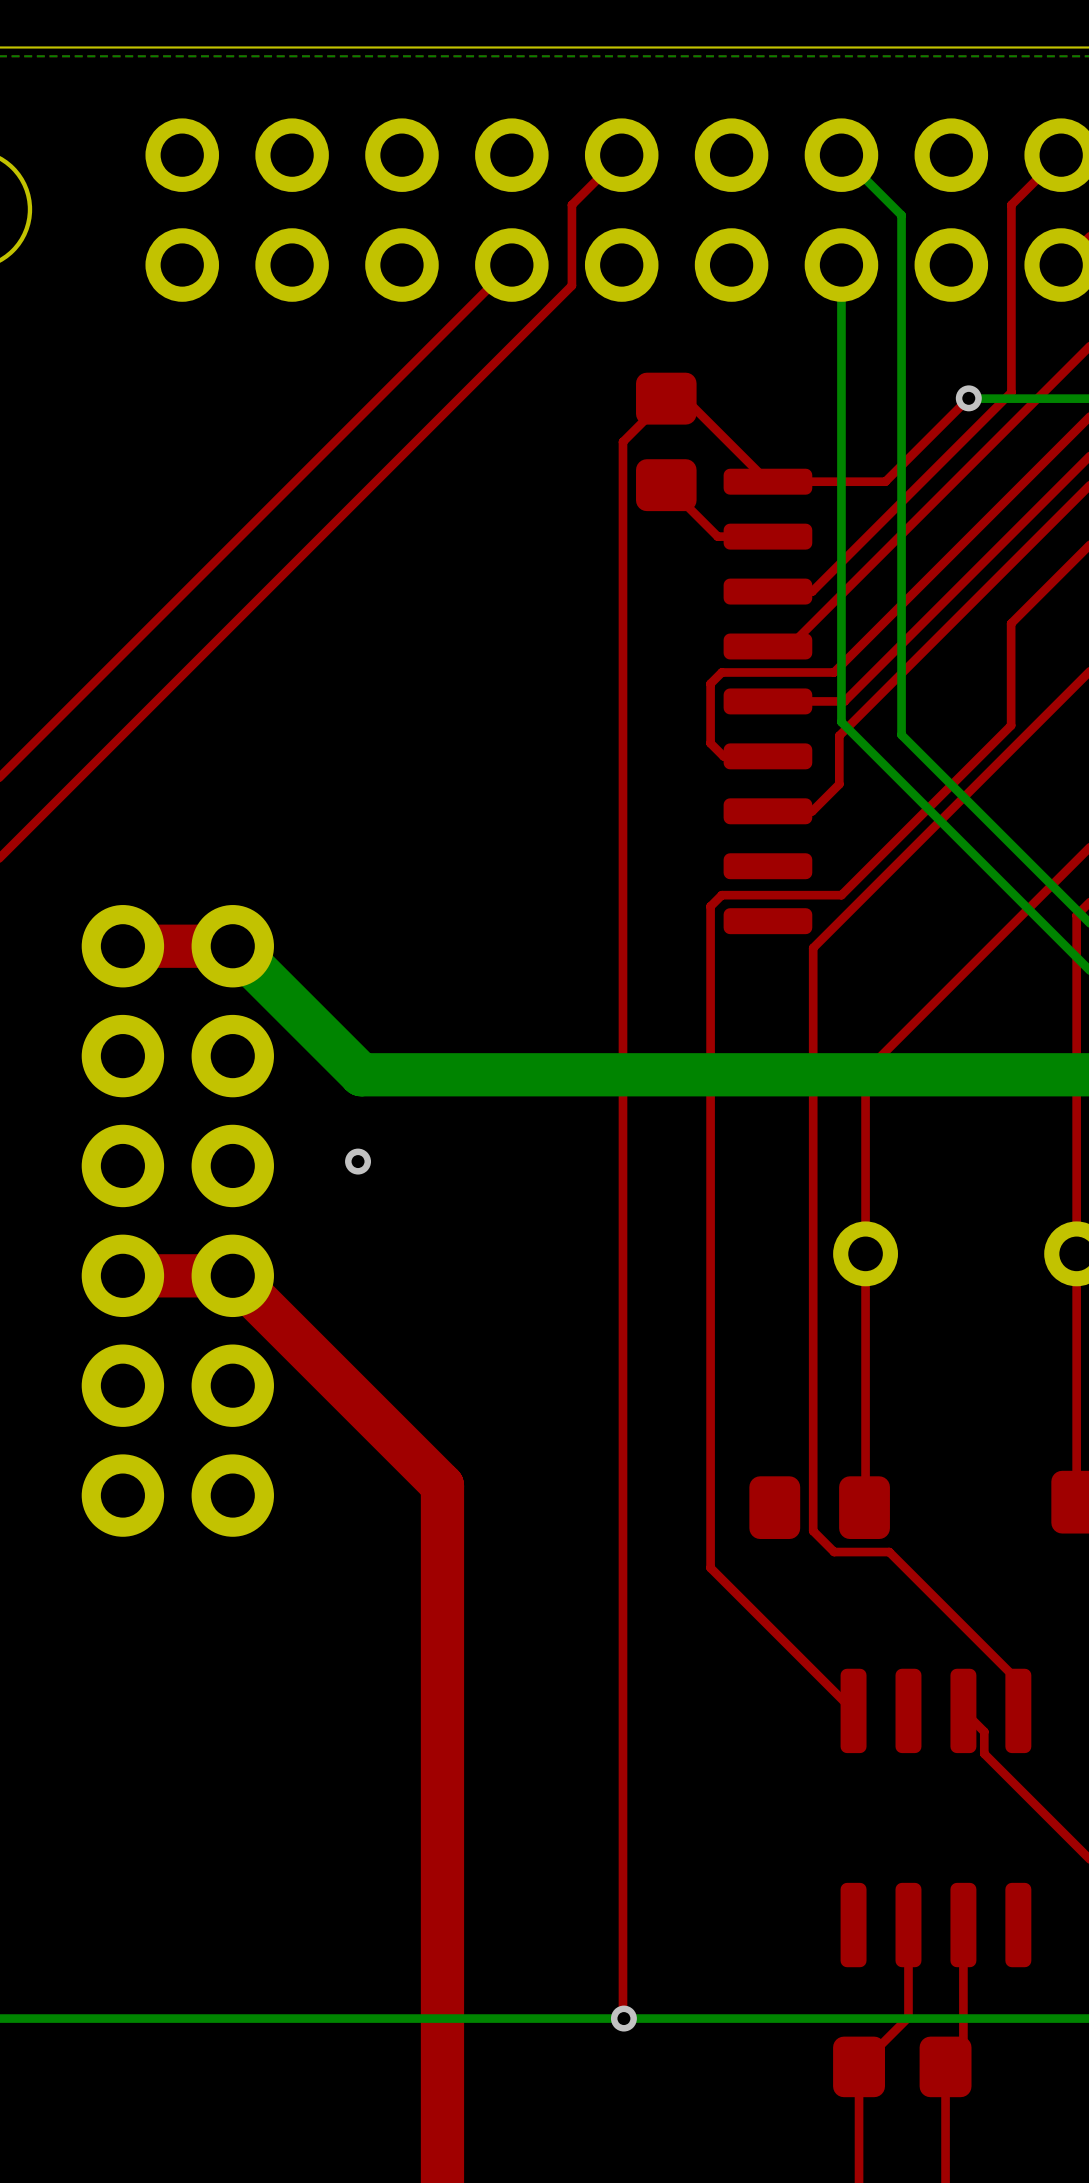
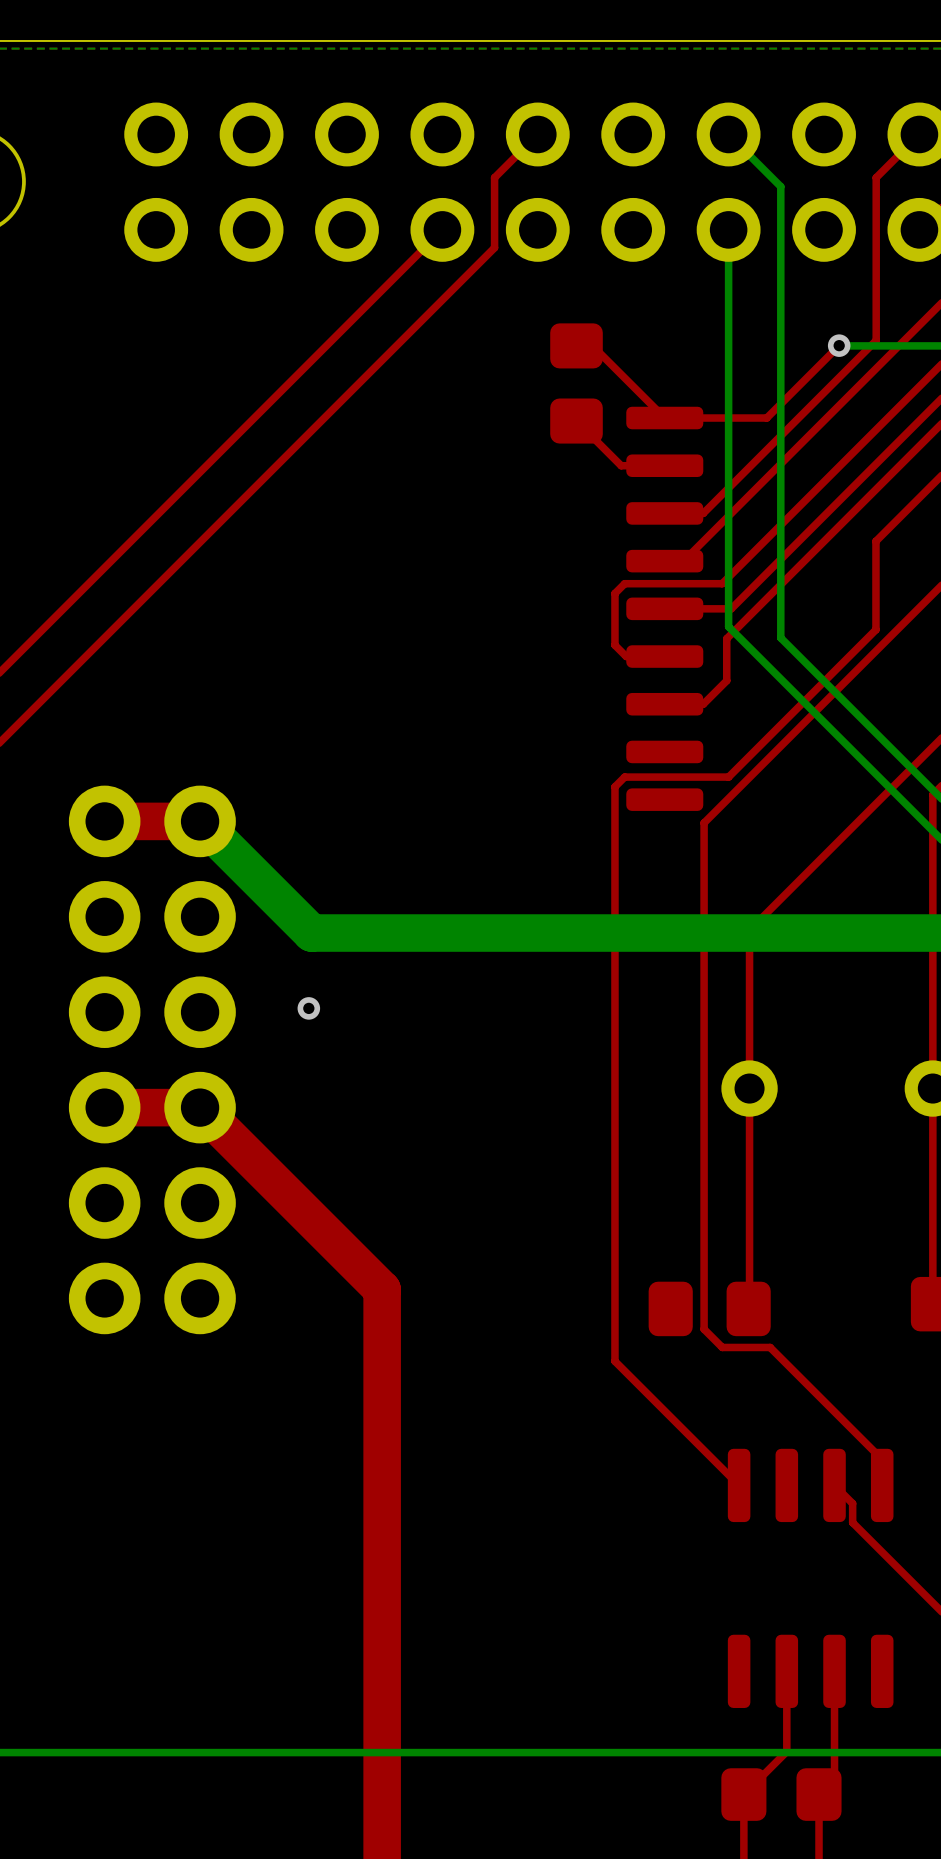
top track: (666, 398) (622, 441) (623, 2018) -> none
via: (623, 2018) -> none

